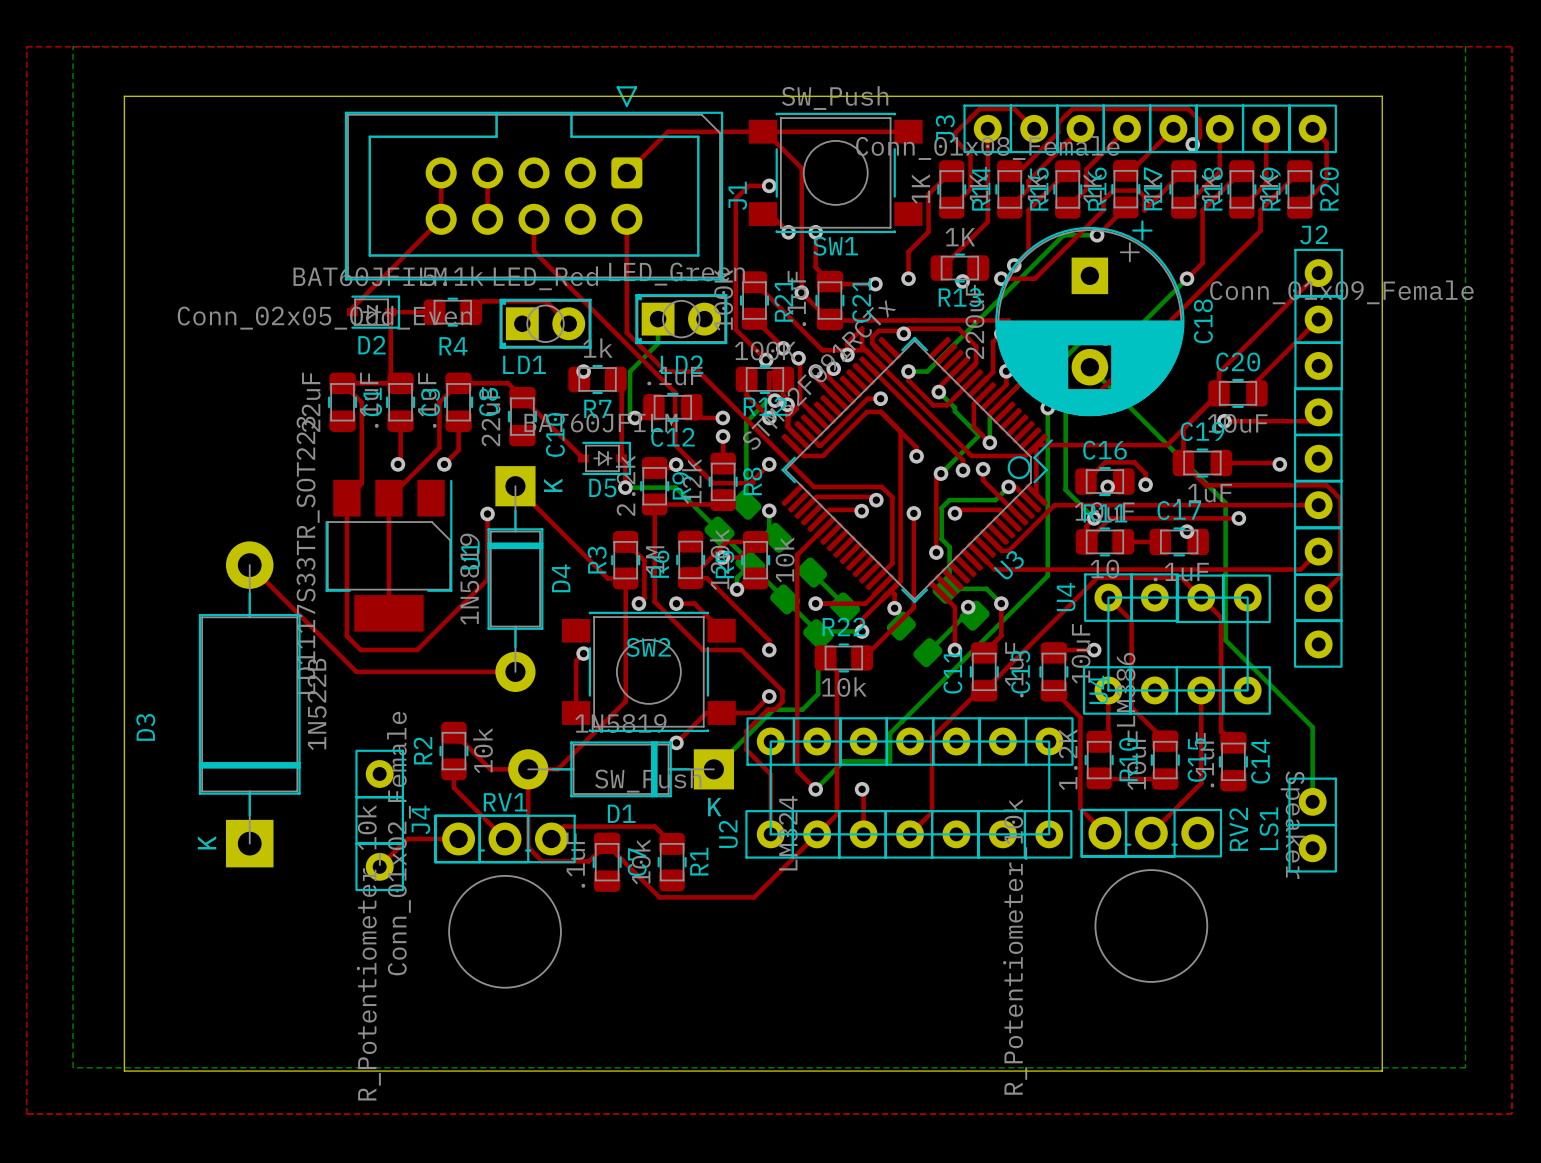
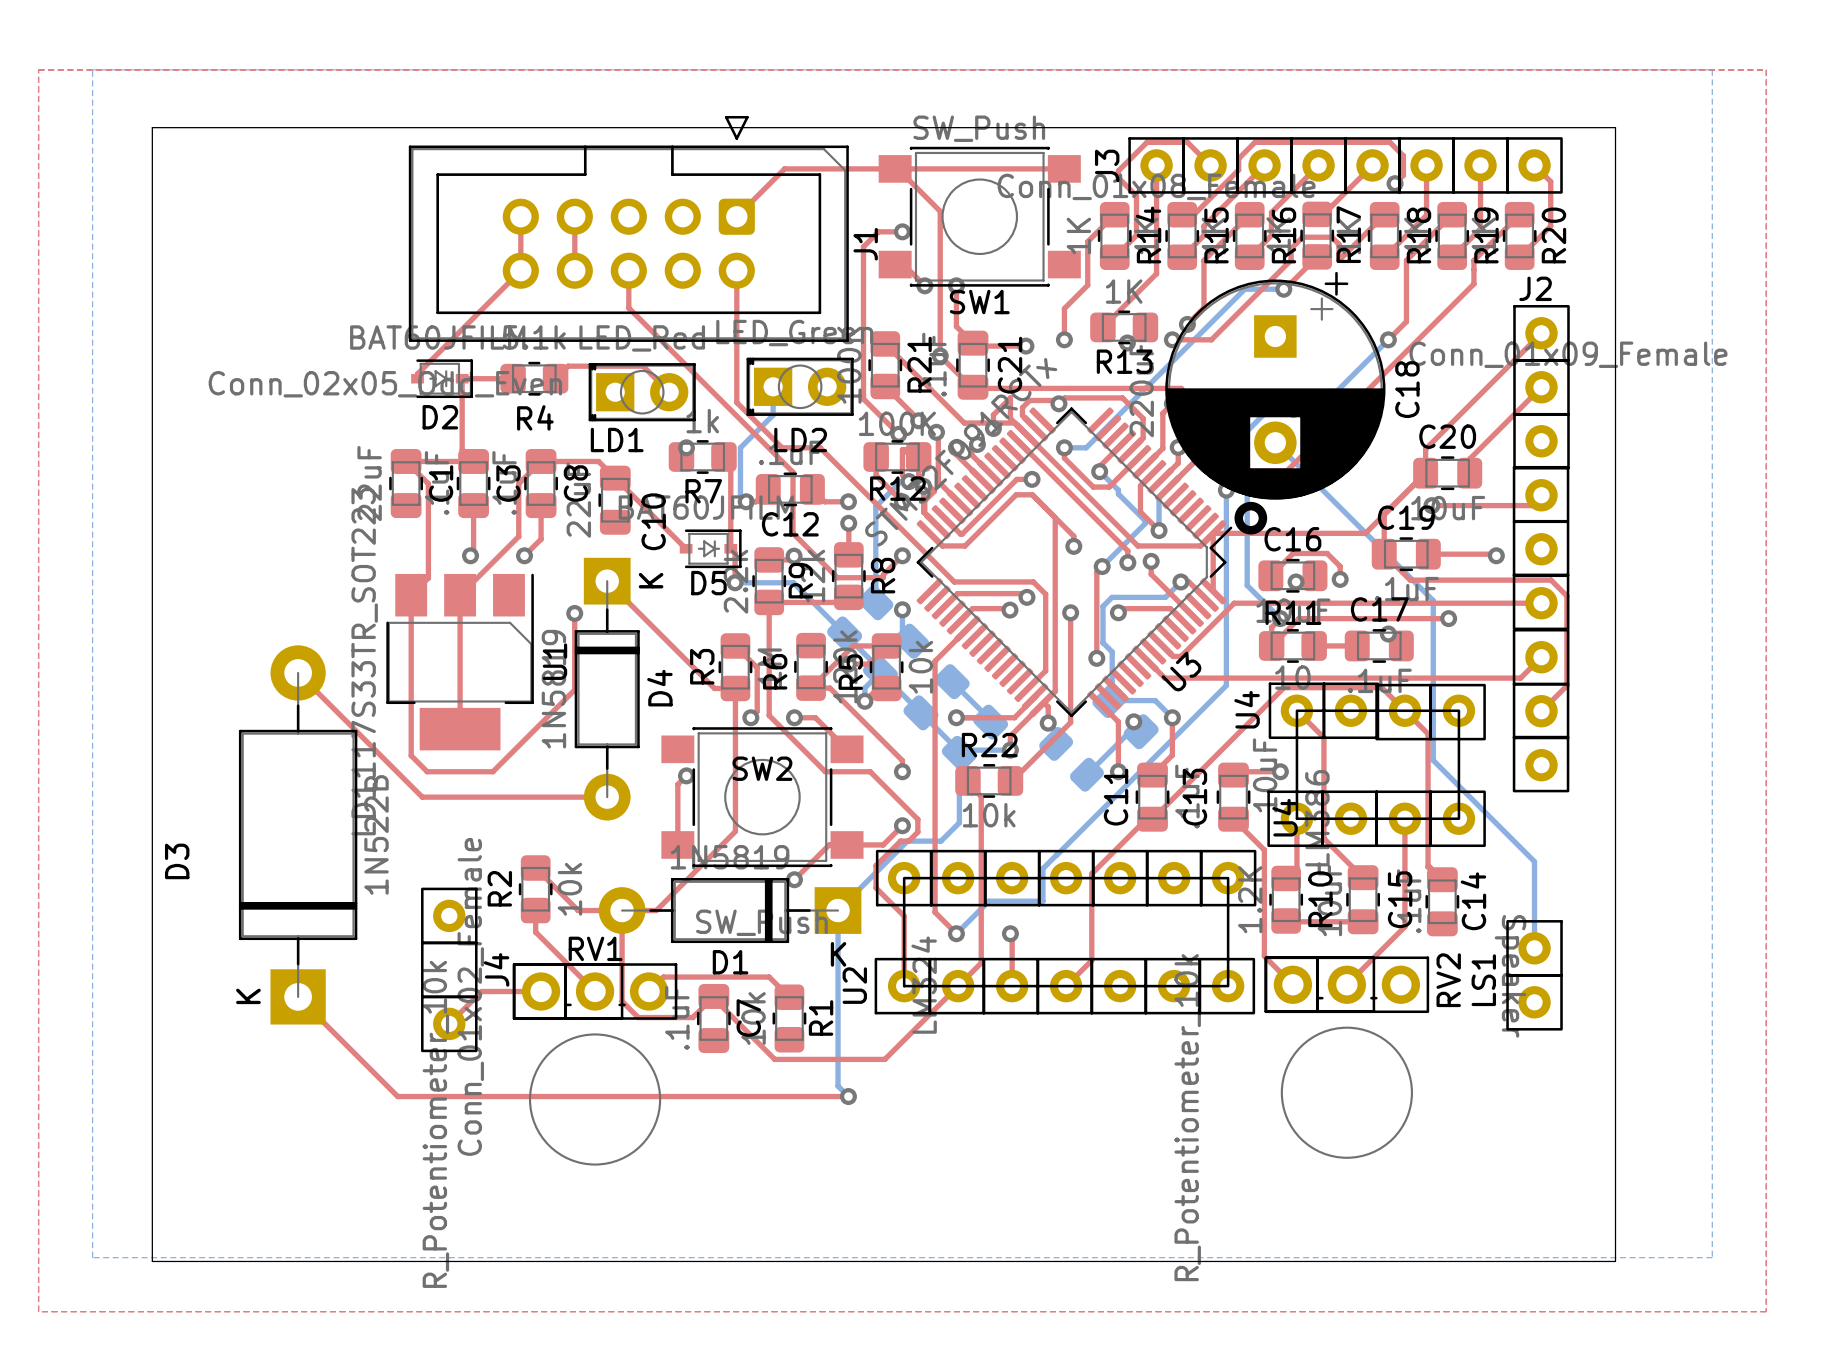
drawing: none -> [1234, 501, 1268, 535]
drawing: [1007, 456, 1031, 480] -> none
bottom track: none -> (838, 910) (838, 1086) (848, 1096)
top track: none -> (298, 996) (397, 1096) (848, 1096)
via: none -> (848, 1096)

